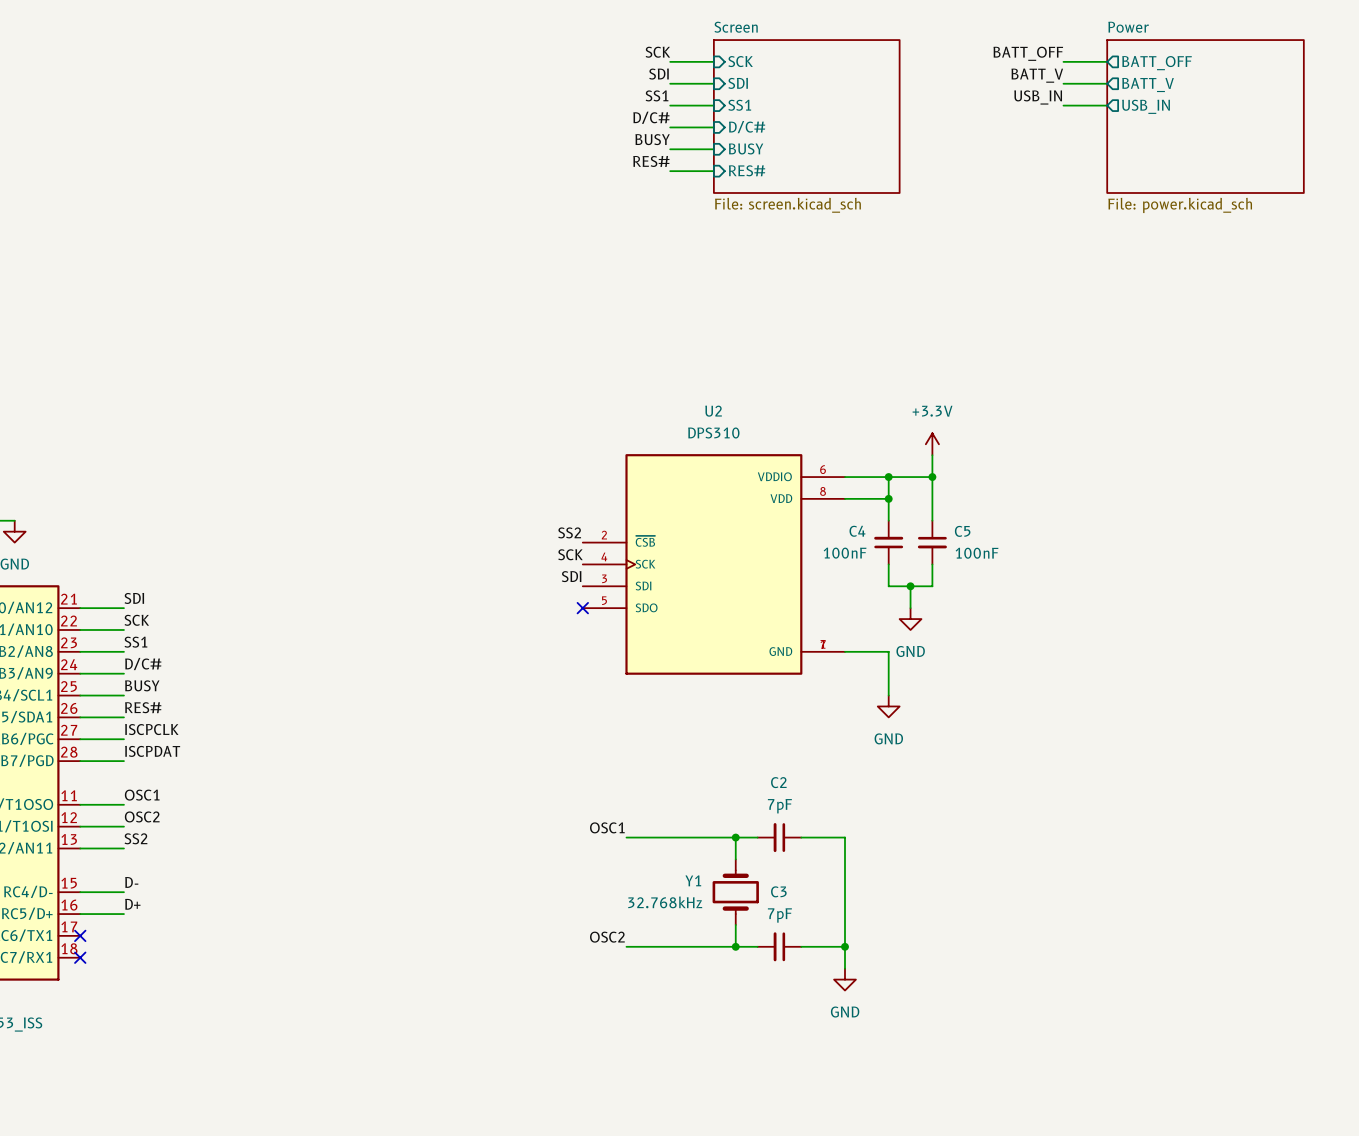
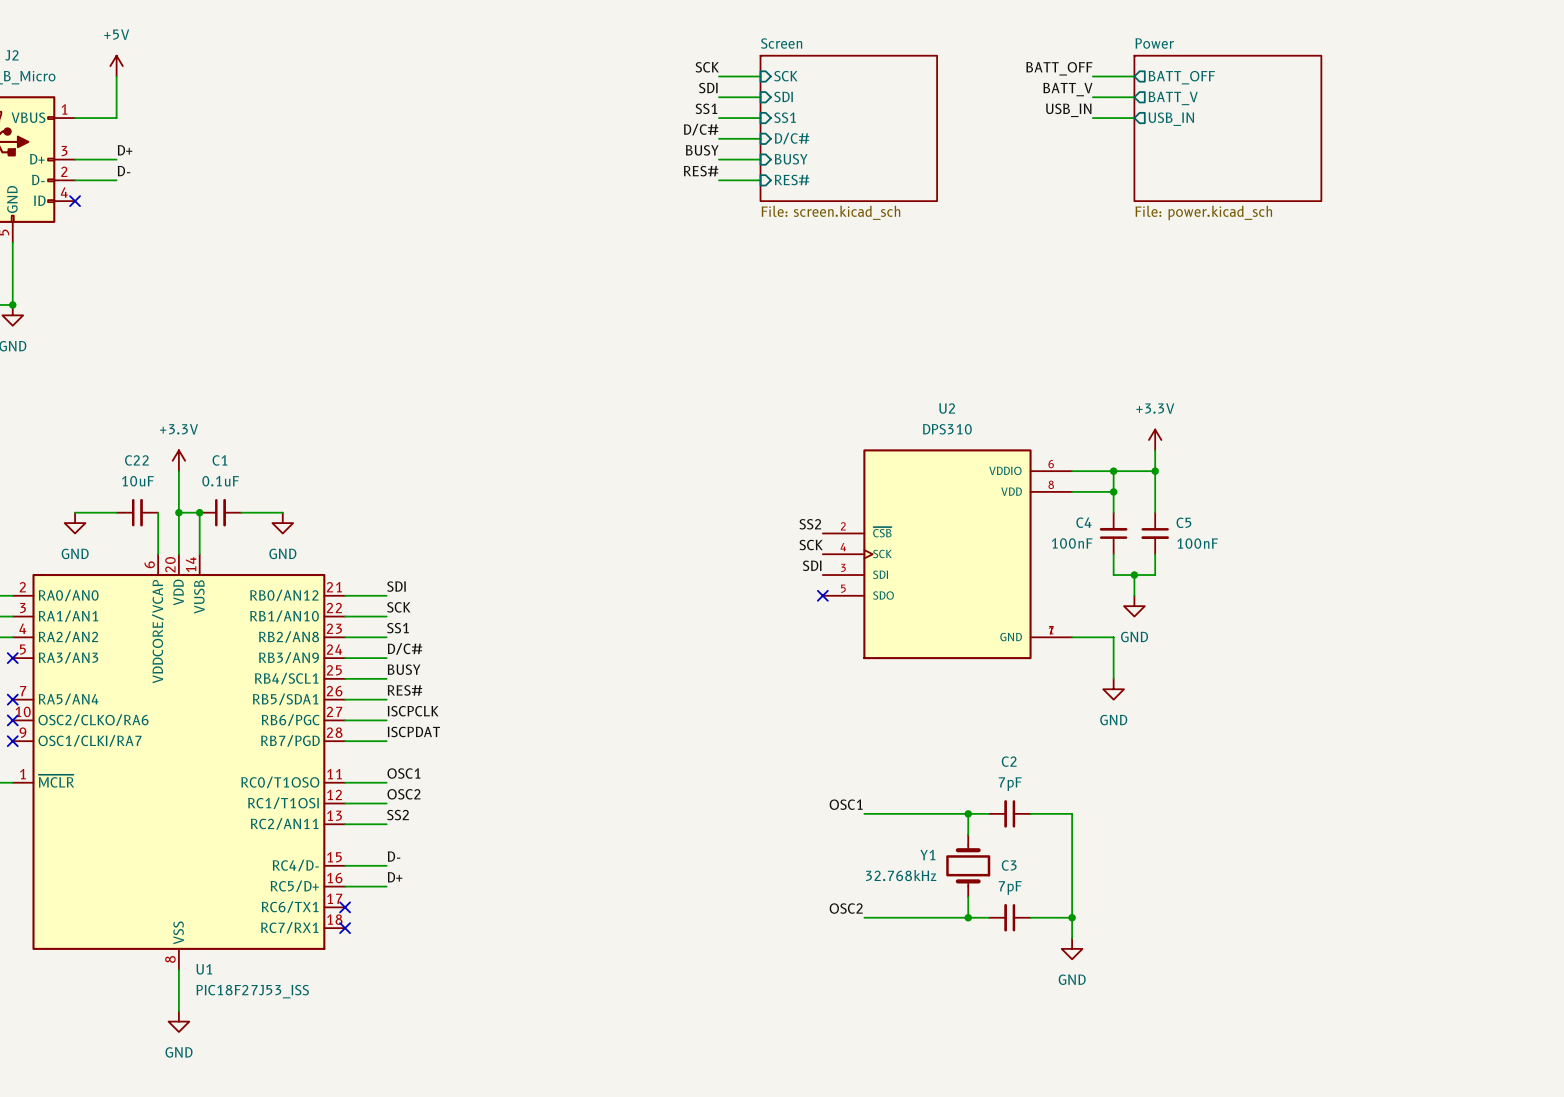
label position: SCK (657, 52) -> SCK (707, 67)
label position: BATT_OFF (1028, 53) -> BATT_OFF (1059, 68)
wire: (670, 61) (713, 61) -> (718, 76) (760, 76)
sheet pin position: SCK (740, 61) -> SCK (785, 76)
wire: (1063, 61) (1107, 61) -> (1092, 76) (1134, 76)
sheet pin position: BATT_OFF (1157, 63) -> BATT_OFF (1181, 77)
label position: SDI (658, 74) -> SDI (708, 88)
label position: BATT_V (1037, 75) -> BATT_V (1067, 89)
wire: (670, 83) (713, 83) -> (718, 97) (760, 97)
sheet pin position: SDI (738, 83) -> SDI (783, 96)
wire: (1063, 83) (1107, 83) -> (1092, 97) (1134, 97)
sheet pin position: BATT_V (1148, 84) -> BATT_V (1173, 98)
label position: SS1 (657, 95) -> SS1 (706, 108)
label position: USB_IN (1038, 97) -> USB_IN (1068, 110)
wire: (670, 105) (713, 105) -> (718, 118) (760, 118)
sheet pin position: SS1 (739, 105) -> SS1 (785, 117)
wire: (1063, 105) (1107, 105) -> (1092, 118) (1134, 118)
sheet pin position: USB_IN (1146, 106) -> USB_IN (1171, 119)
sheet Screen position: (806, 116) -> (848, 128)
sheet Power position: (1205, 116) -> (1227, 128)
label position: D/C# (651, 117) -> D/C# (701, 129)
wire: (670, 127) (713, 127) -> (718, 138) (760, 138)
sheet pin position: D/C# (747, 127) -> D/C# (792, 138)
label position: BUSY (652, 139) -> BUSY (702, 150)
sheet pin position: BUSY (746, 148) -> BUSY (791, 159)
wire: (670, 149) (713, 149) -> (718, 159) (760, 159)
label position: RES# (651, 161) -> RES# (701, 171)
sheet pin position: RES# (747, 170) -> RES# (792, 180)
wire: (670, 171) (713, 171) -> (718, 180) (760, 180)

